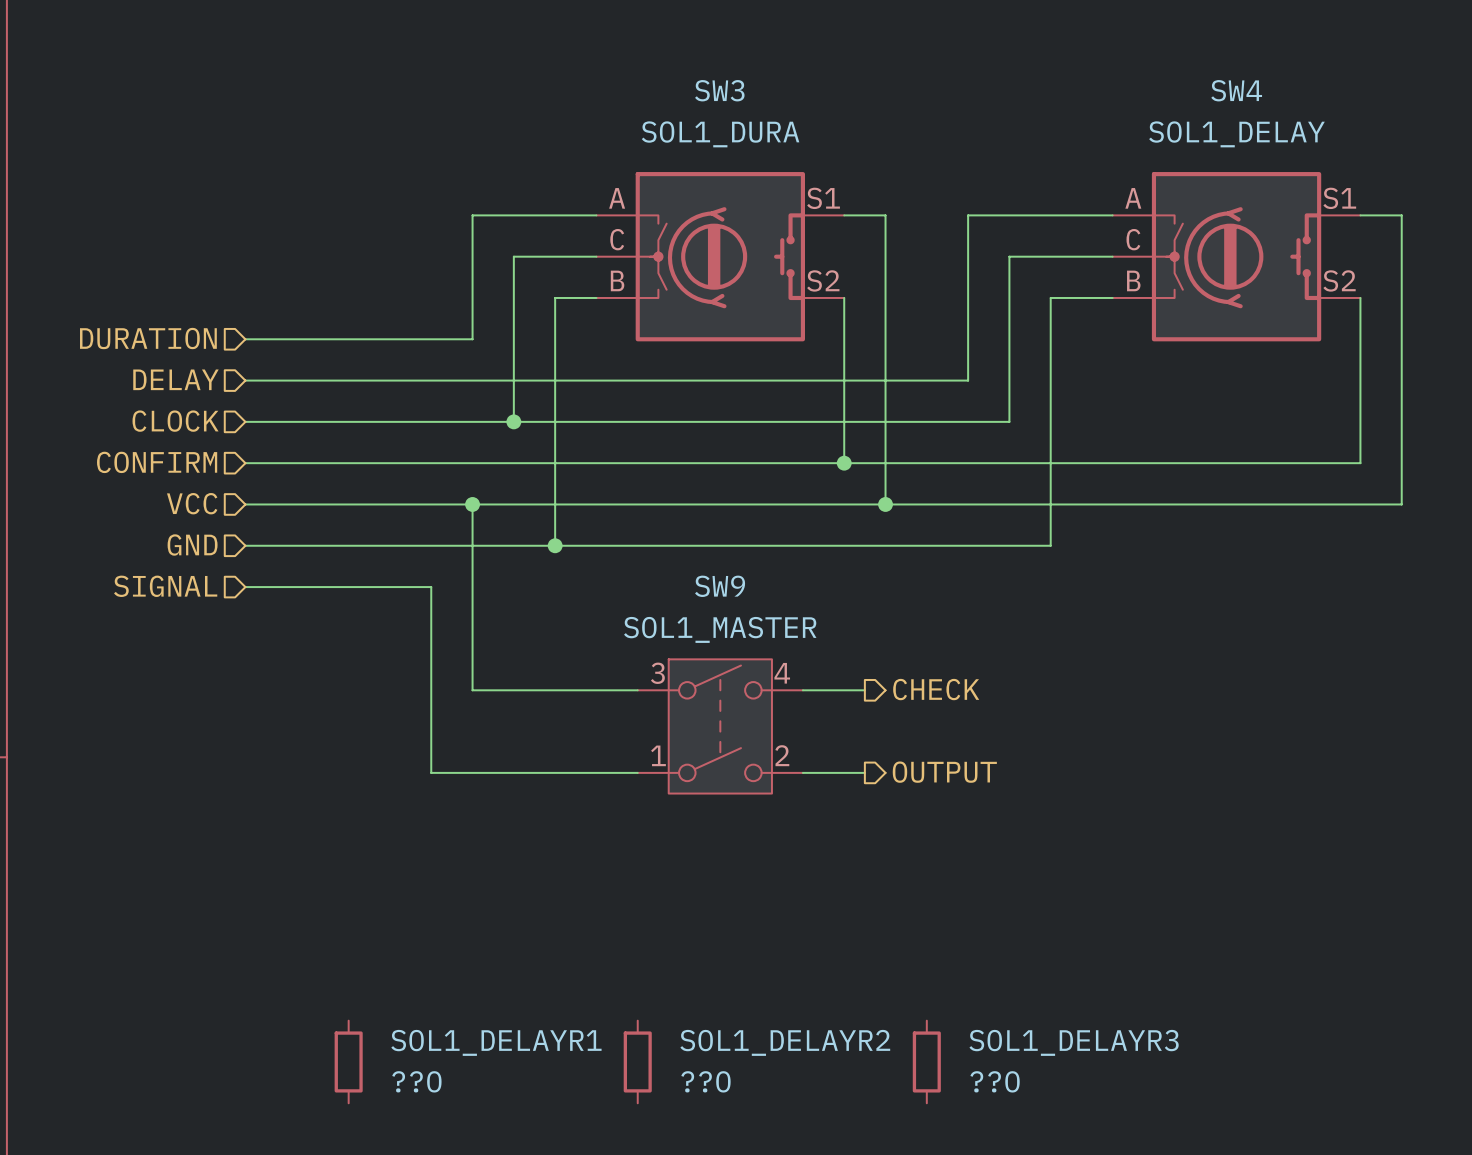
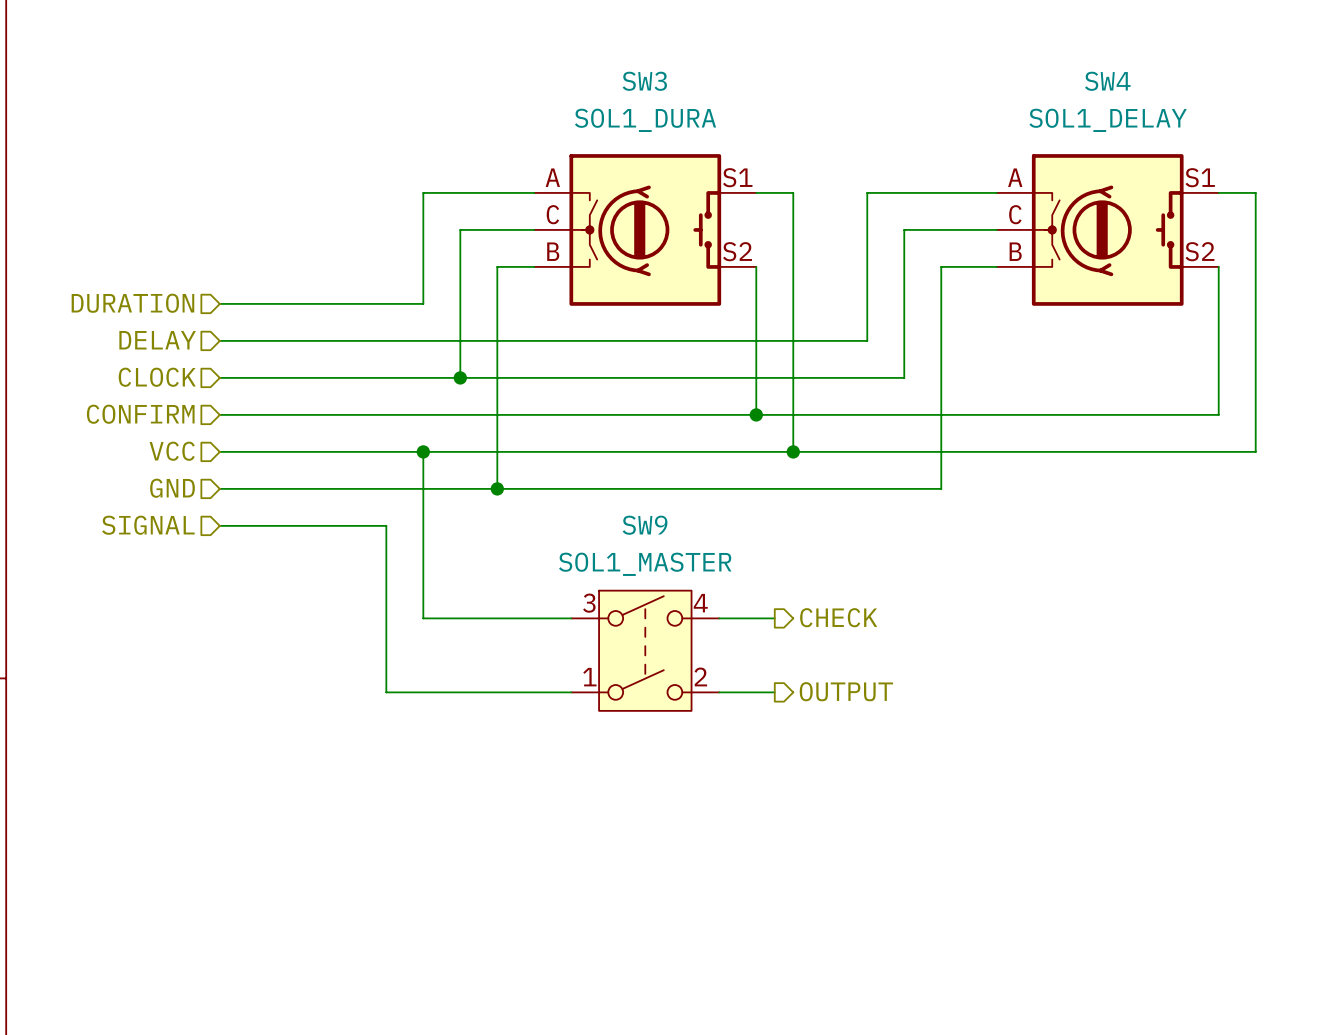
SOL1_DELAYR1: ??O (348, 1061) -> none
SOL1_DELAYR2: ??O (637, 1061) -> none
SOL1_DELAYR3: ??O (926, 1061) -> none

